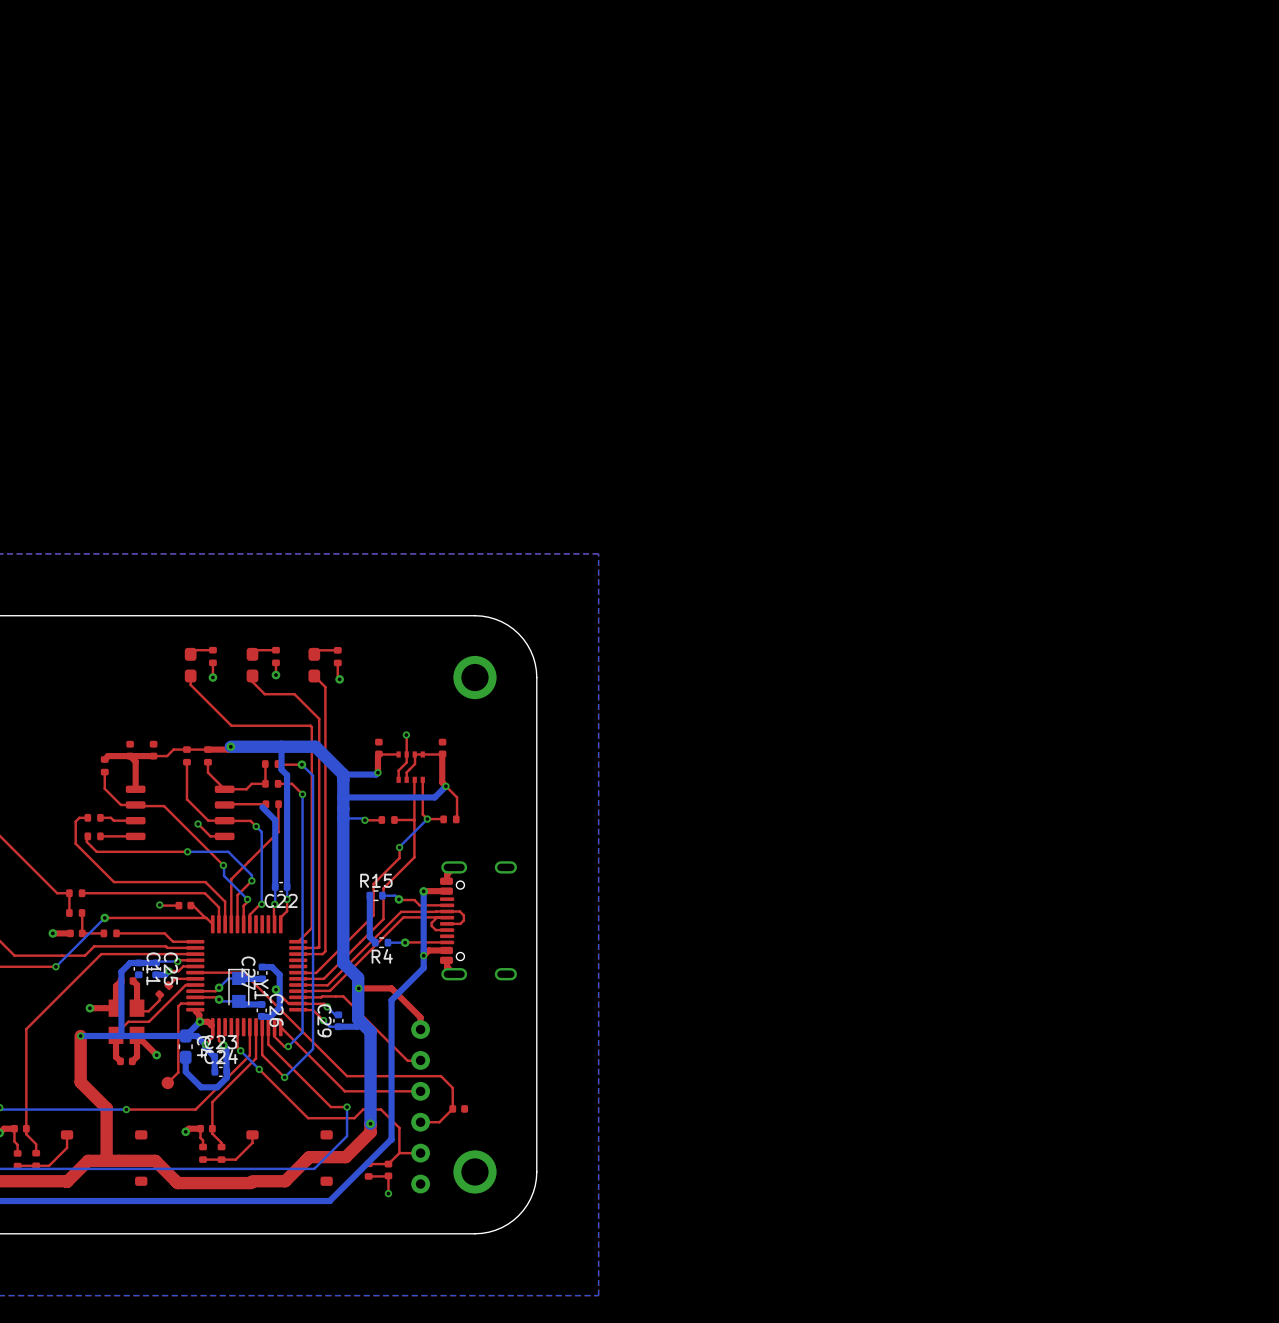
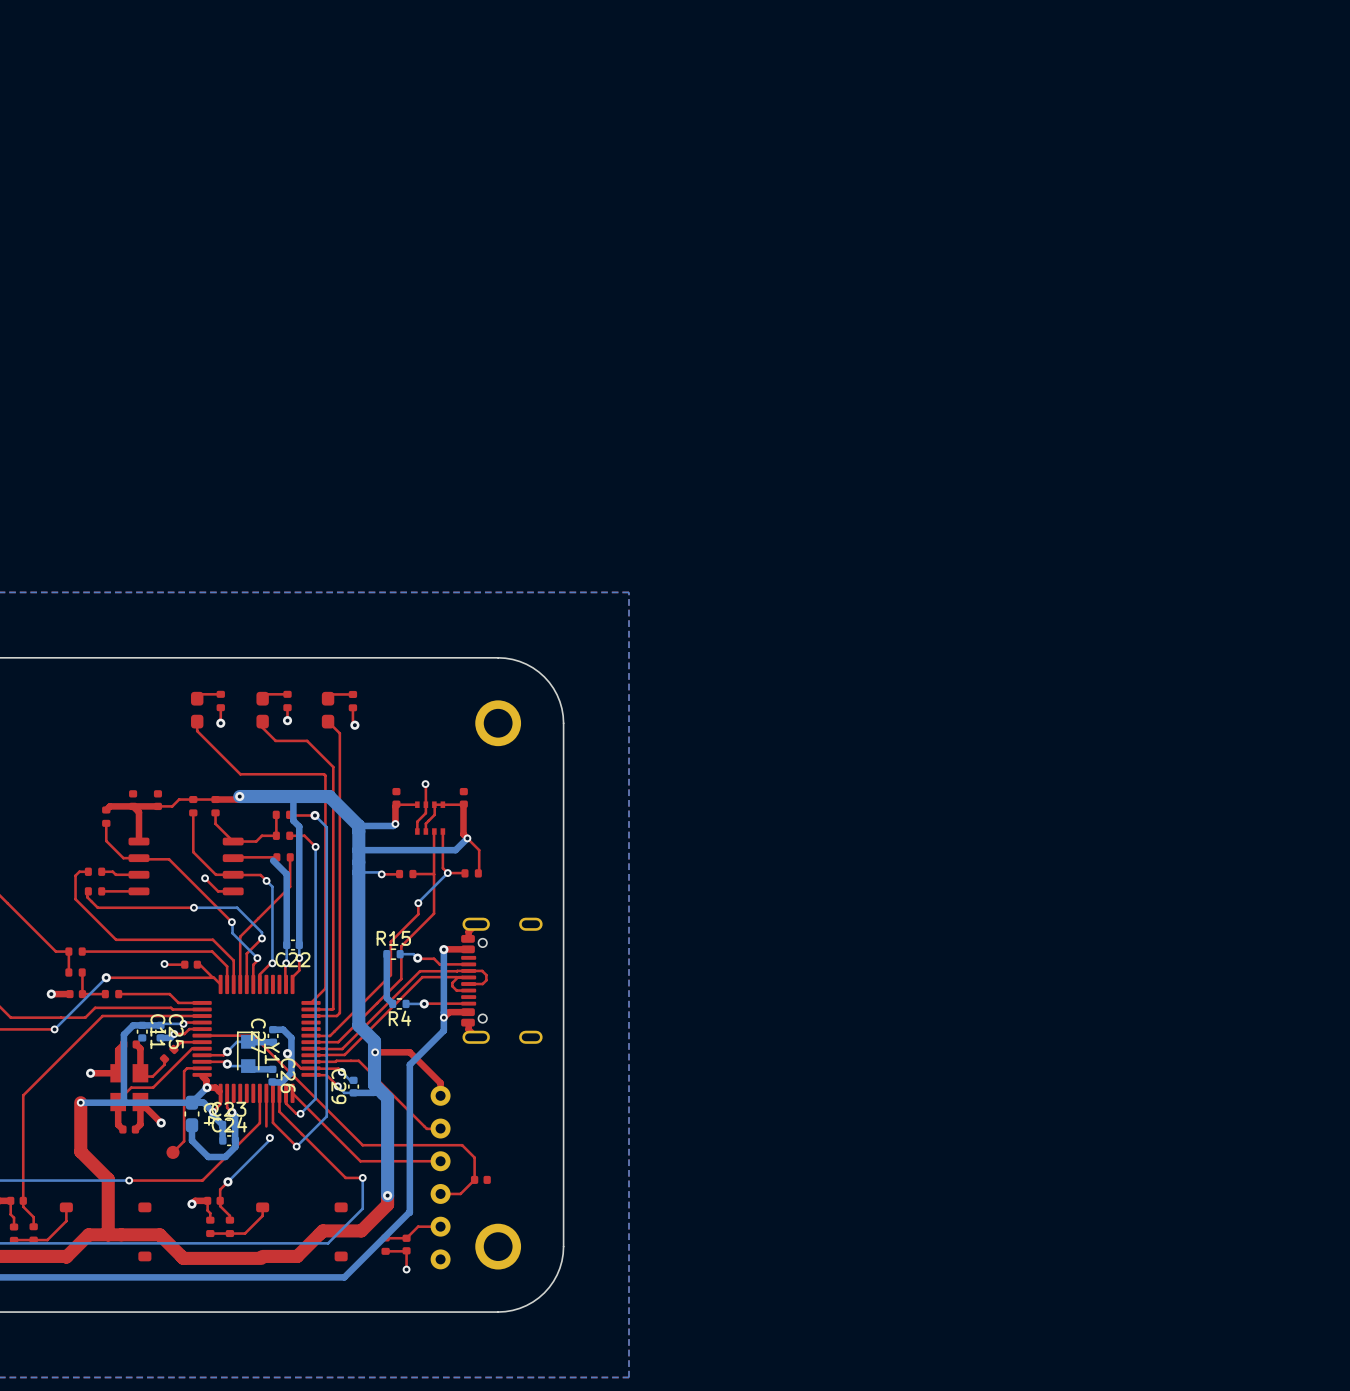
top track: (237, 1027) (237, 1047) (240, 1050) -> none
bottom track: (240, 1050) (259, 1069) -> none
via: (240, 1050) -> none
top track: (256, 1058) (212, 1102) (212, 1118) -> (227, 1181) (220, 1189)
bottom track: none -> (272, 1136) (227, 1181)
top track: (259, 1069) (308, 1118) (354, 1118) (363, 1109) (381, 1109) (399, 1127) (399, 1153) -> none
via: none -> (227, 1181)

